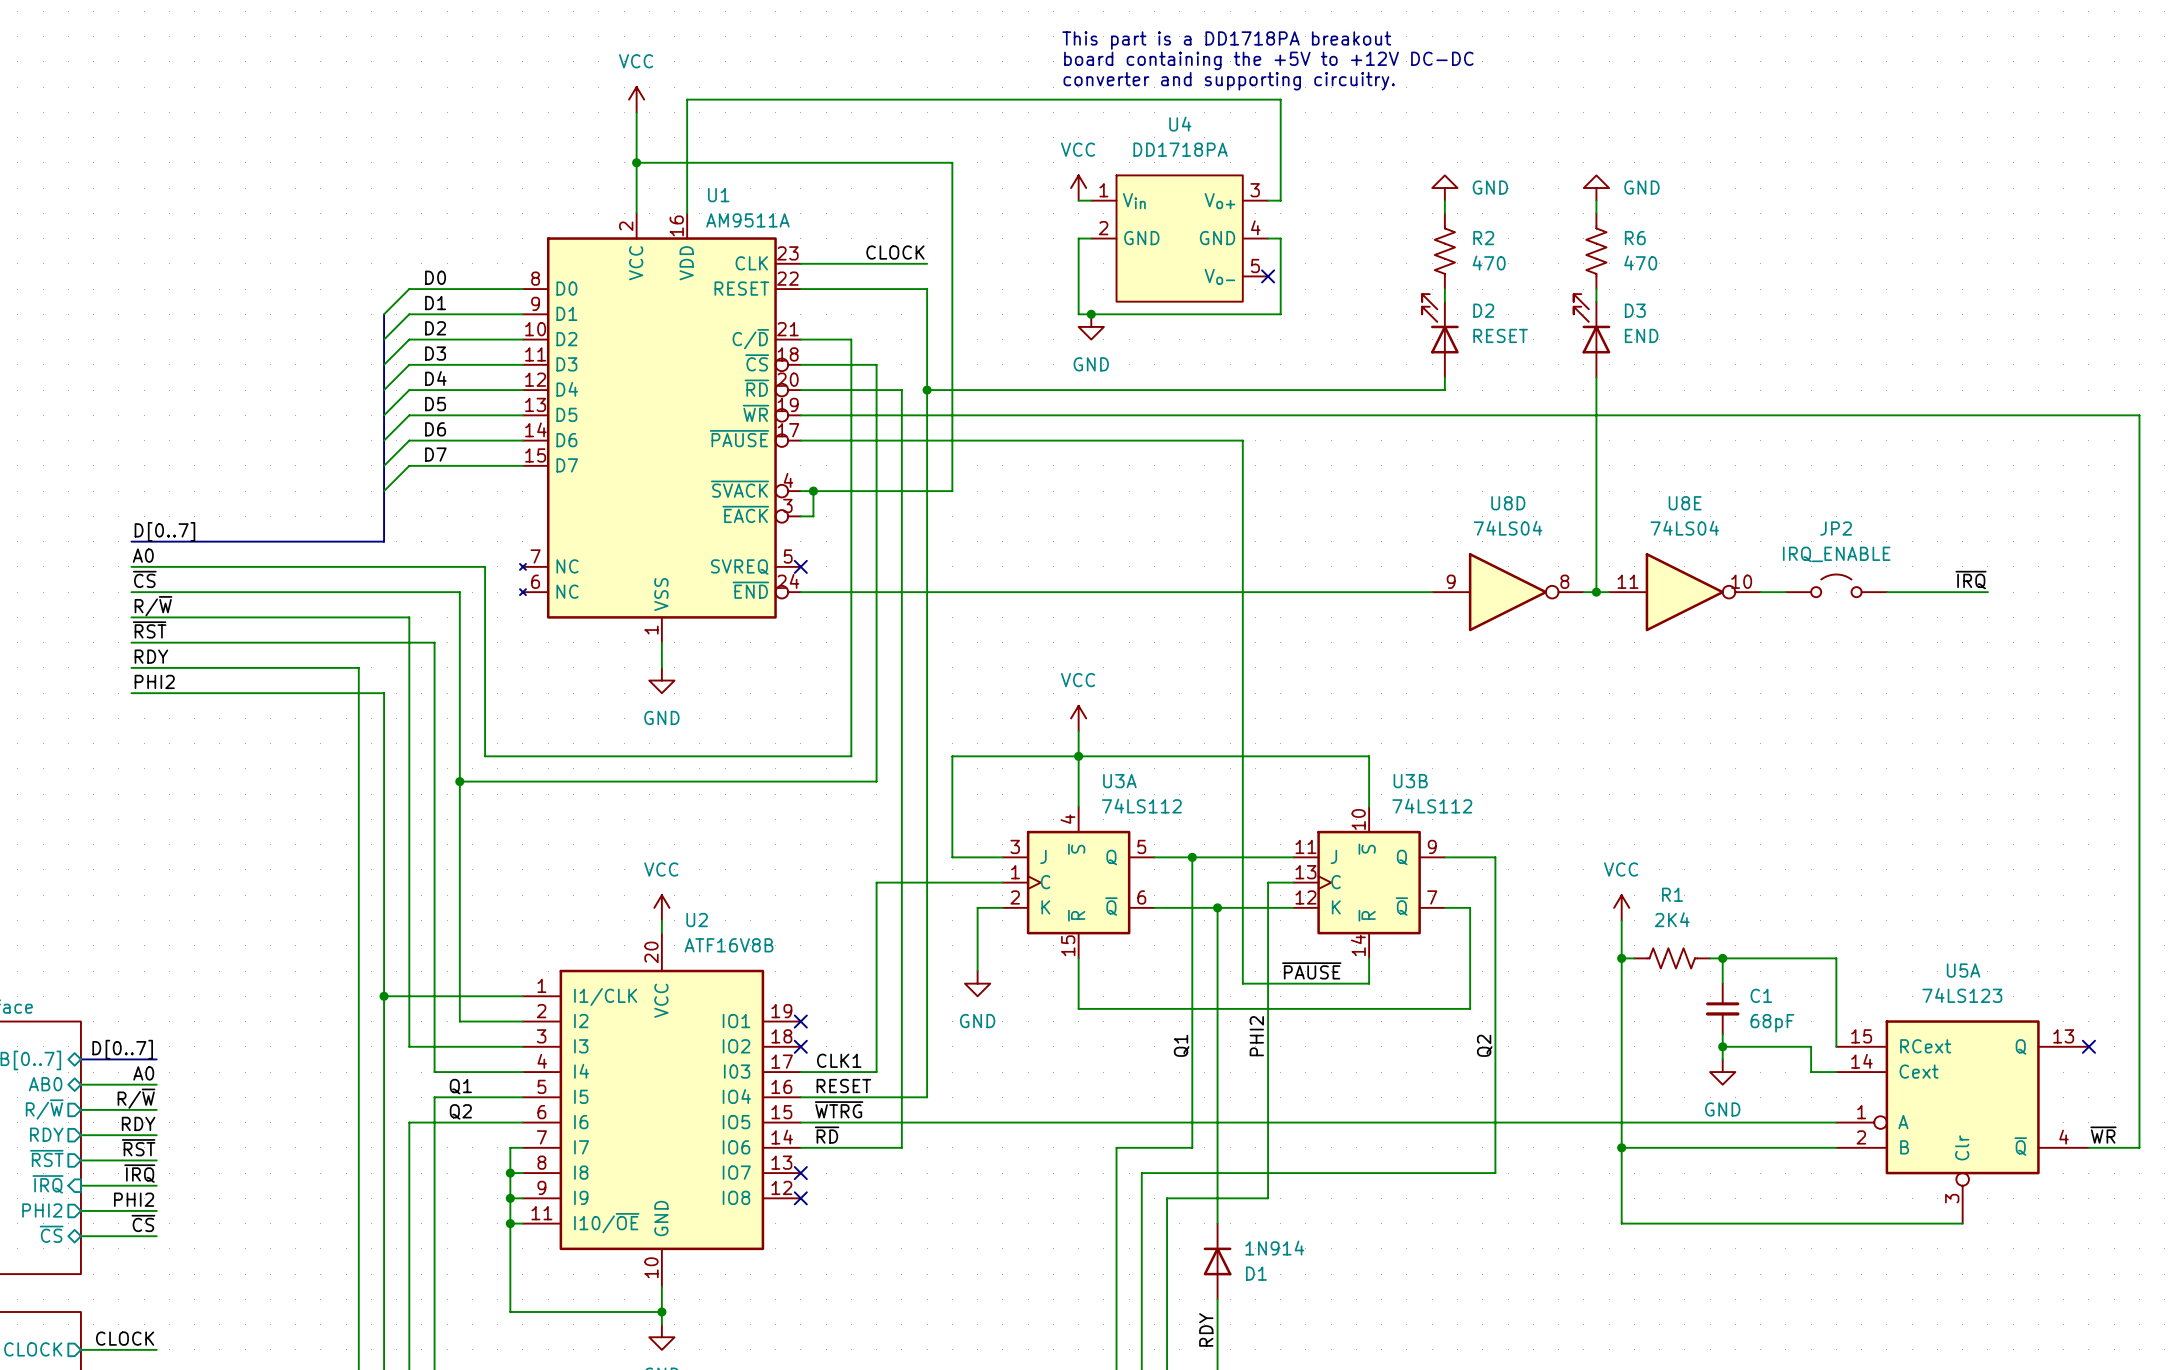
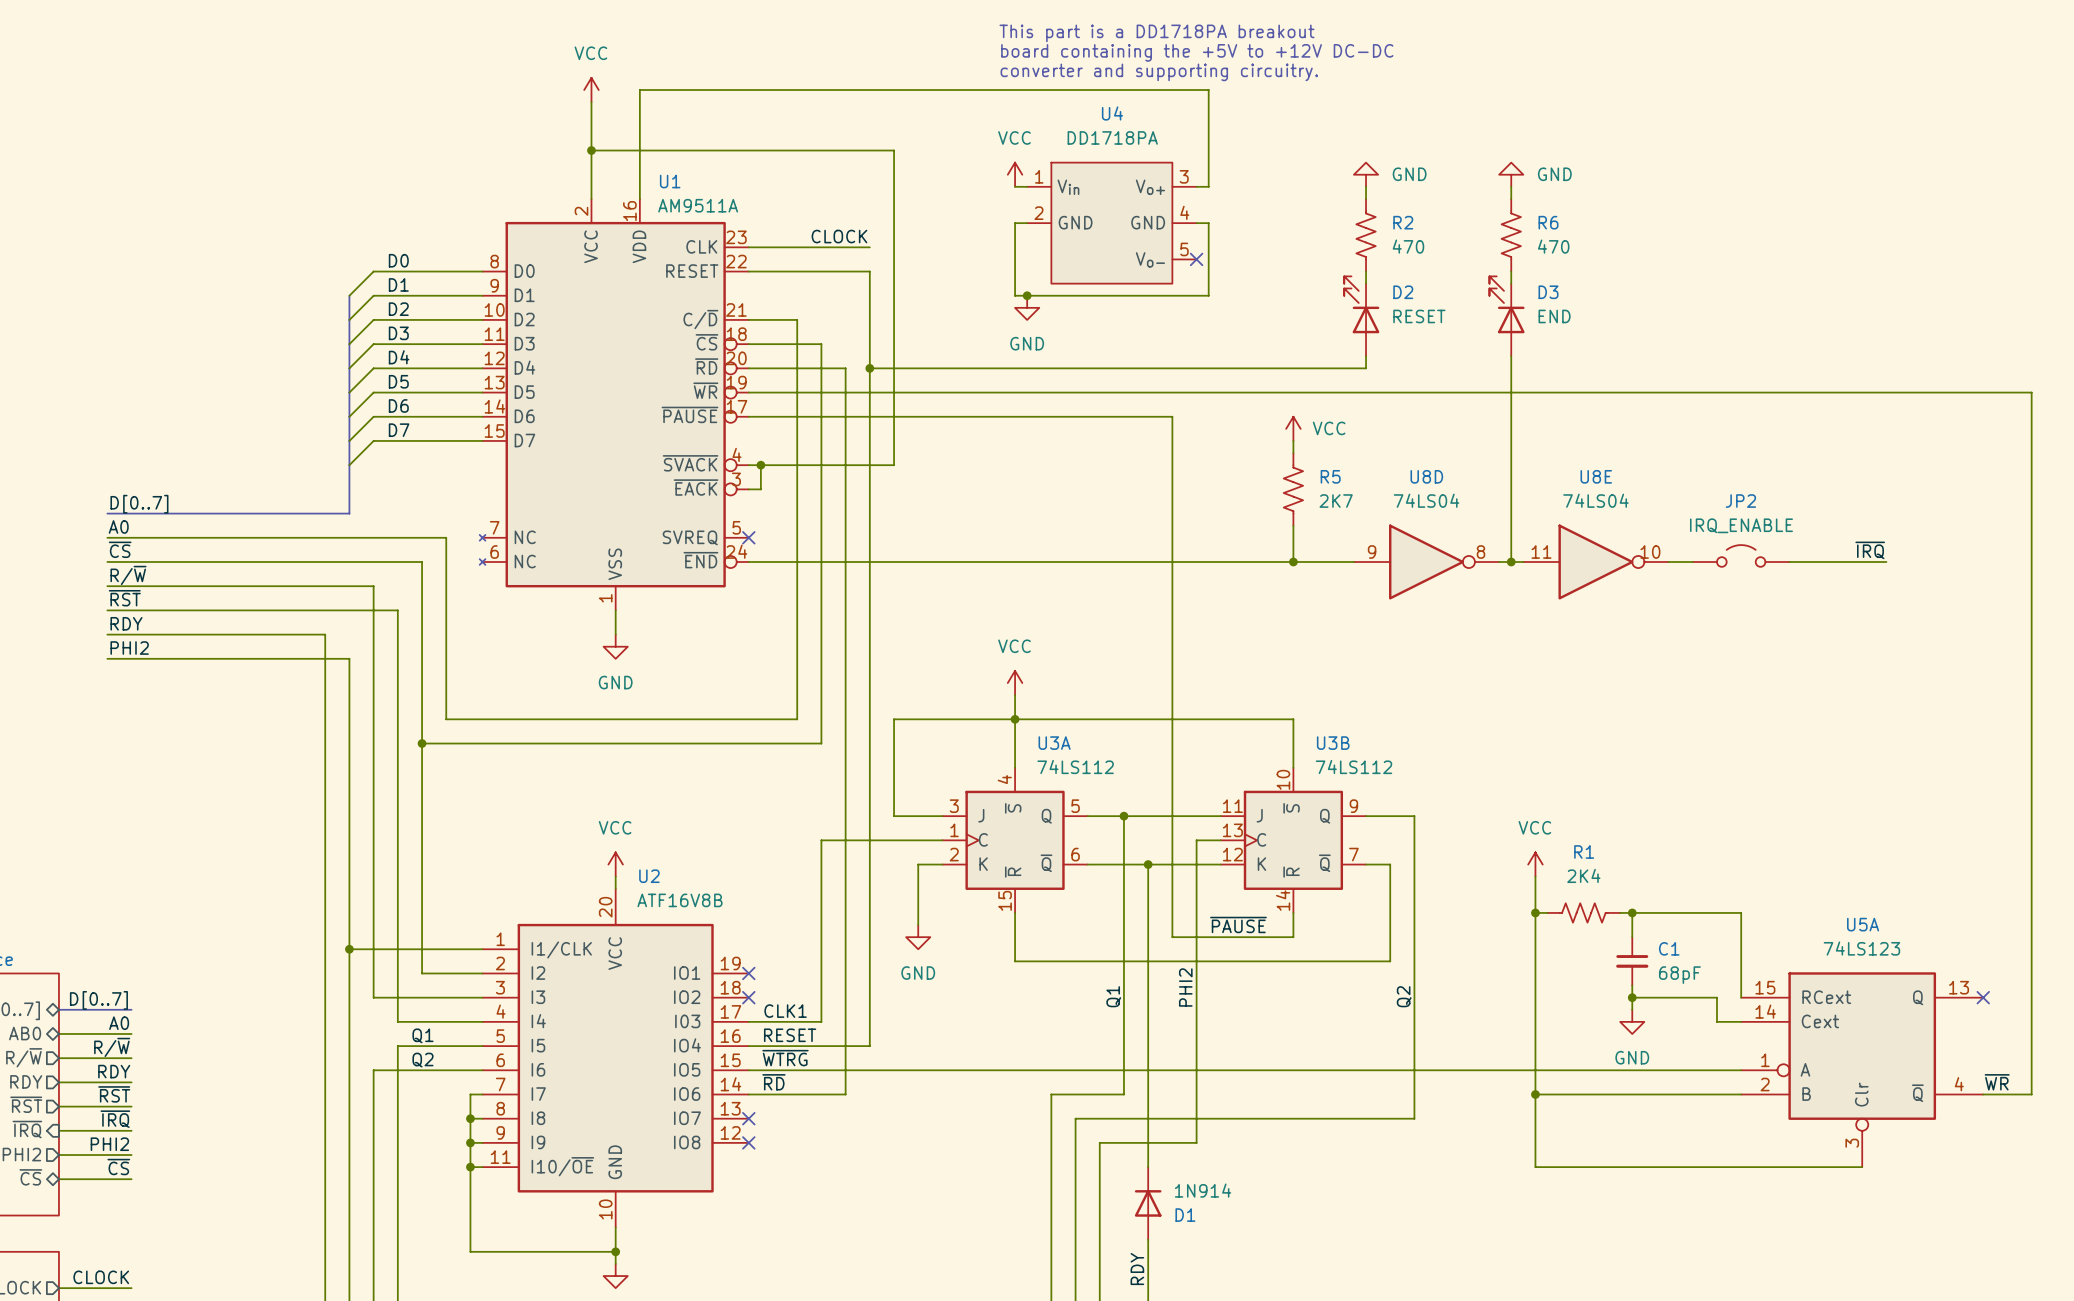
power symbol: none -> VCC (1293, 428)
wire: none -> (1293, 440) (1293, 453)
R5: none -> 2K7 (1293, 489)
wire: none -> (1293, 525) (1293, 561)
junction: none -> (1293, 561)

